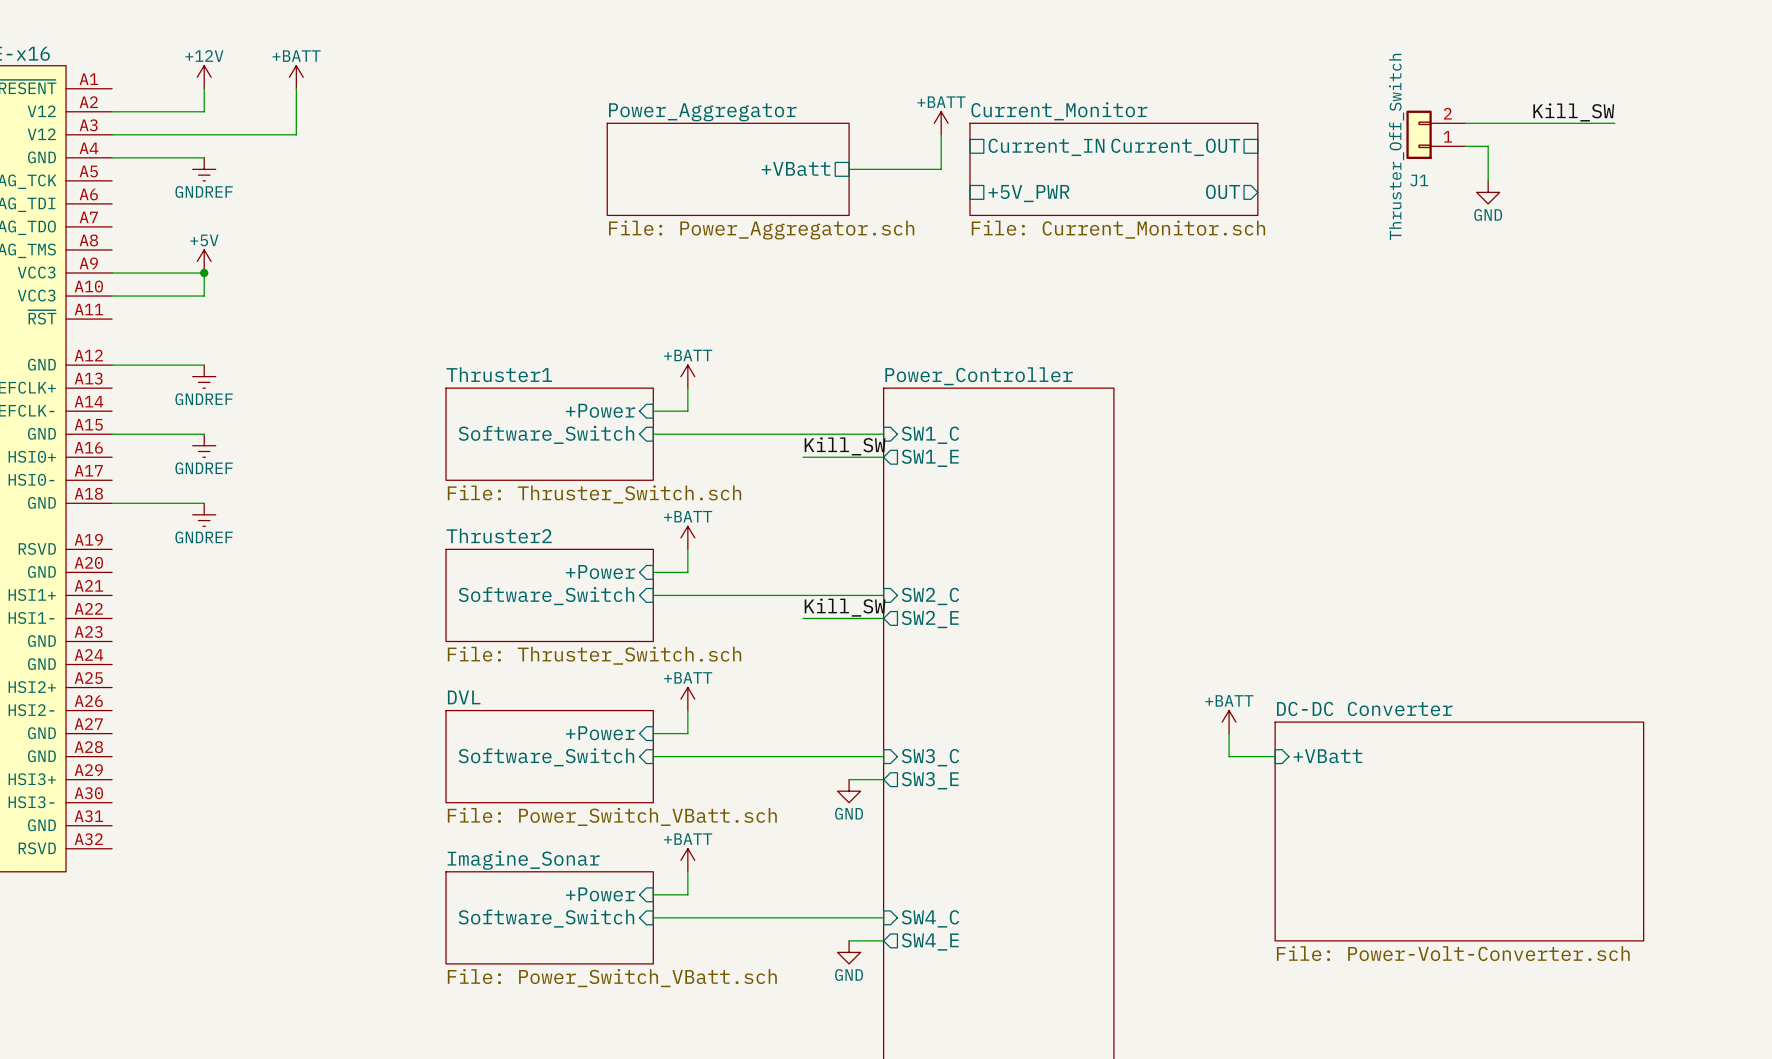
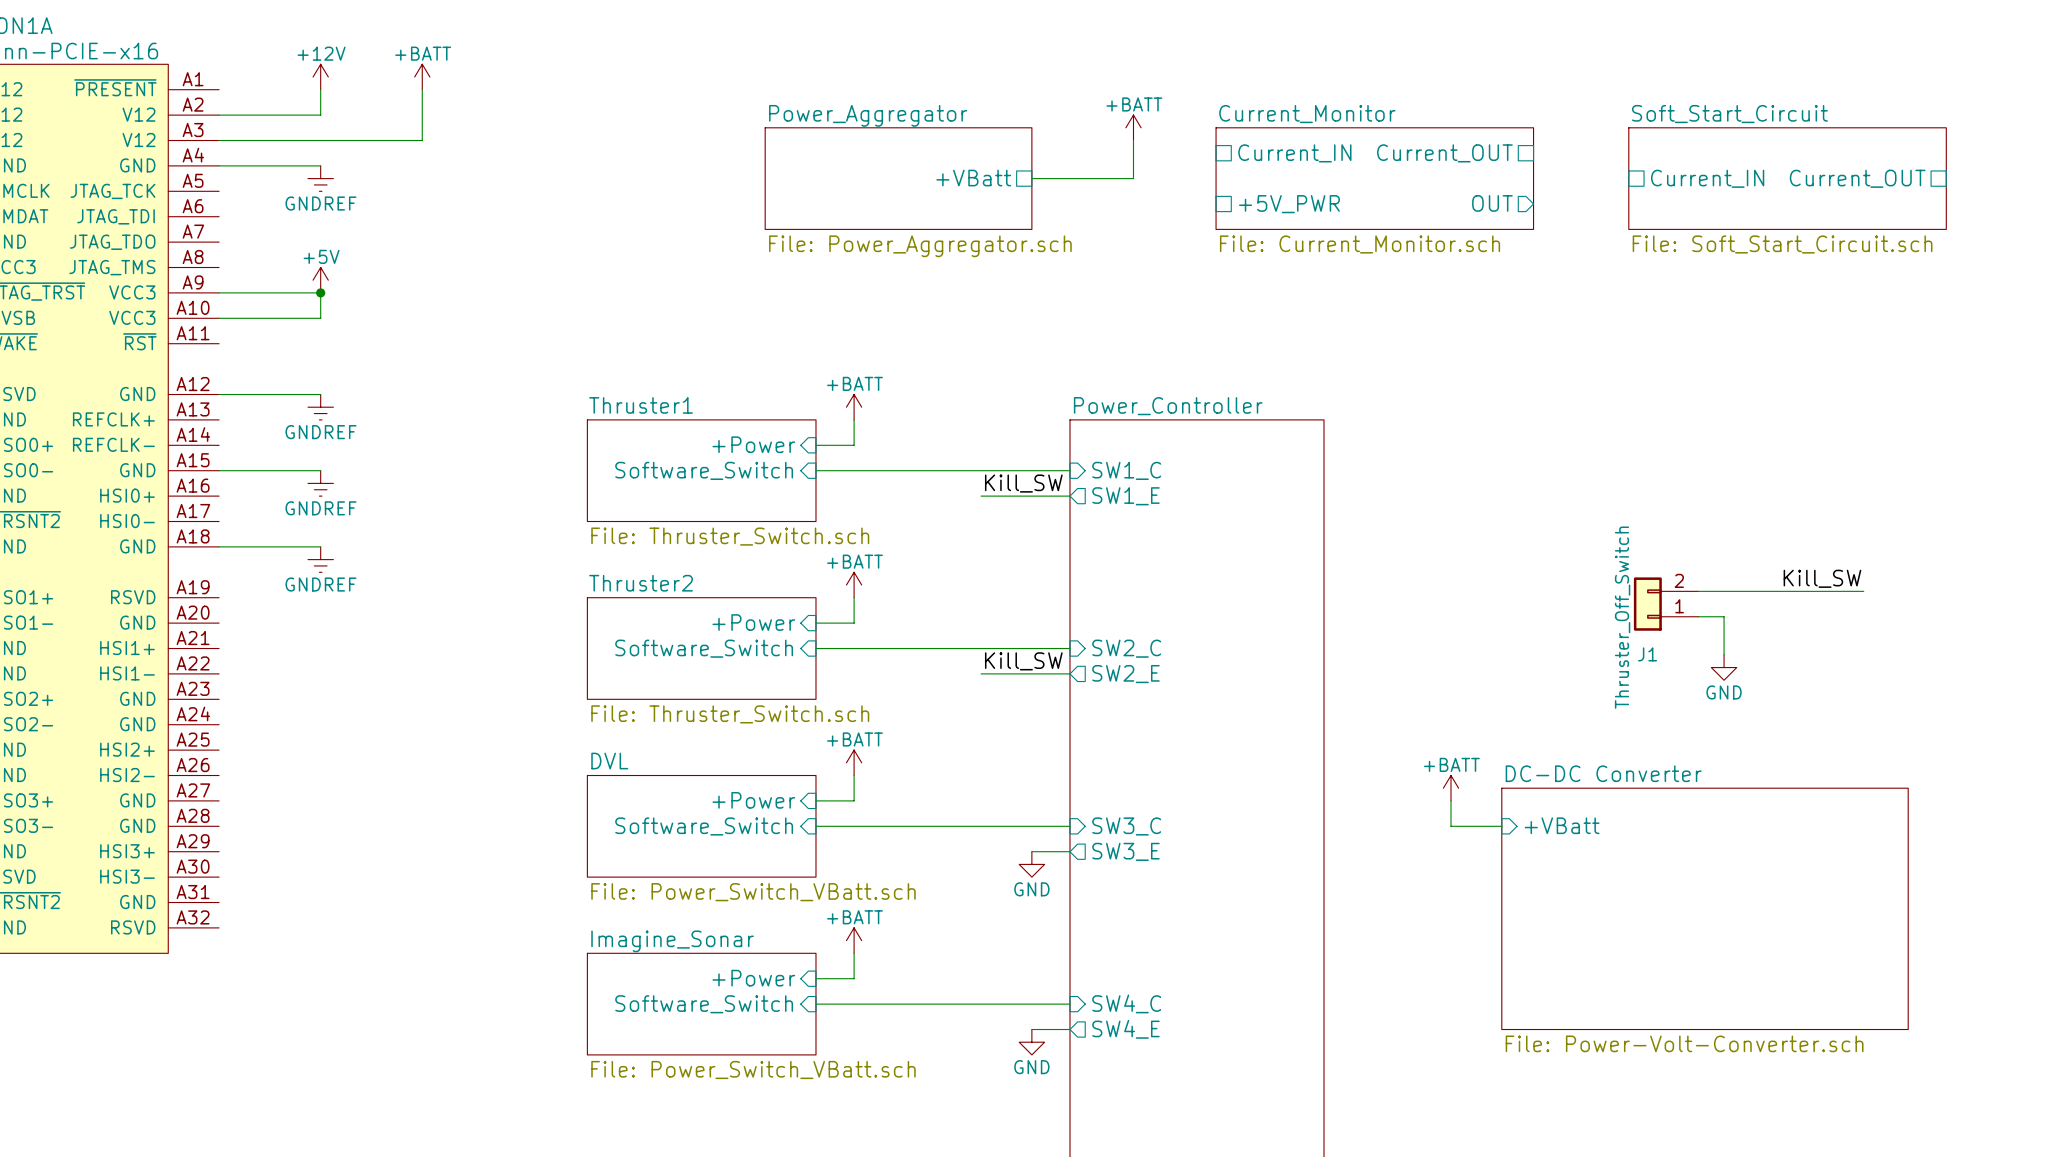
label: Kill_SW (1573, 112) -> none
J1 position: (1435, 134) -> (1666, 604)
wire: (1465, 146) (1488, 146) (1488, 180) -> none
sheet pin position: Current_IN (1046, 147) -> Current_IN (1294, 153)
sheet pin position: Current_OUT (1175, 147) -> Current_OUT (1444, 153)
sheet Current_Monitor position: (1113, 169) -> (1374, 178)
sheet Soft_Start_Circuit: none -> File: Soft_Start_Circuit.sch (1787, 178)
sheet pin: none -> Current_IN (1707, 178)
sheet pin: none -> Current_OUT (1857, 178)
sheet pin position: OUT (1223, 191) -> OUT (1492, 203)
power symbol: GND (1488, 192) -> none
sheet pin position: +5V_PWR (1028, 193) -> +5V_PWR (1289, 204)
label: none -> Kill_SW (1822, 578)
wire: none -> (1698, 591) (1863, 591)
wire: none -> (1698, 616) (1724, 616) (1724, 654)
power symbol: none -> GND (1724, 667)

